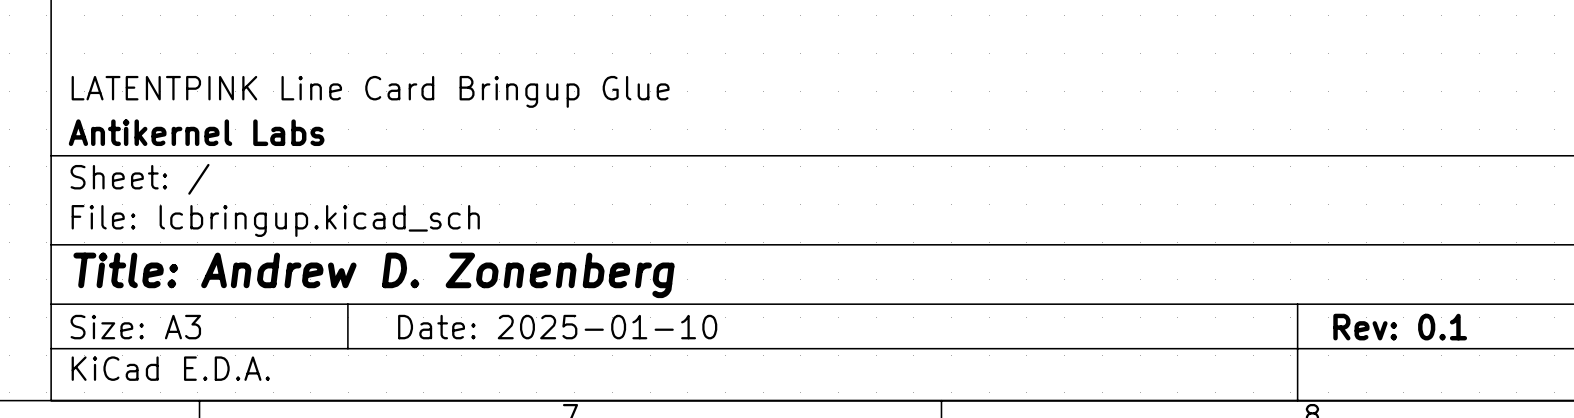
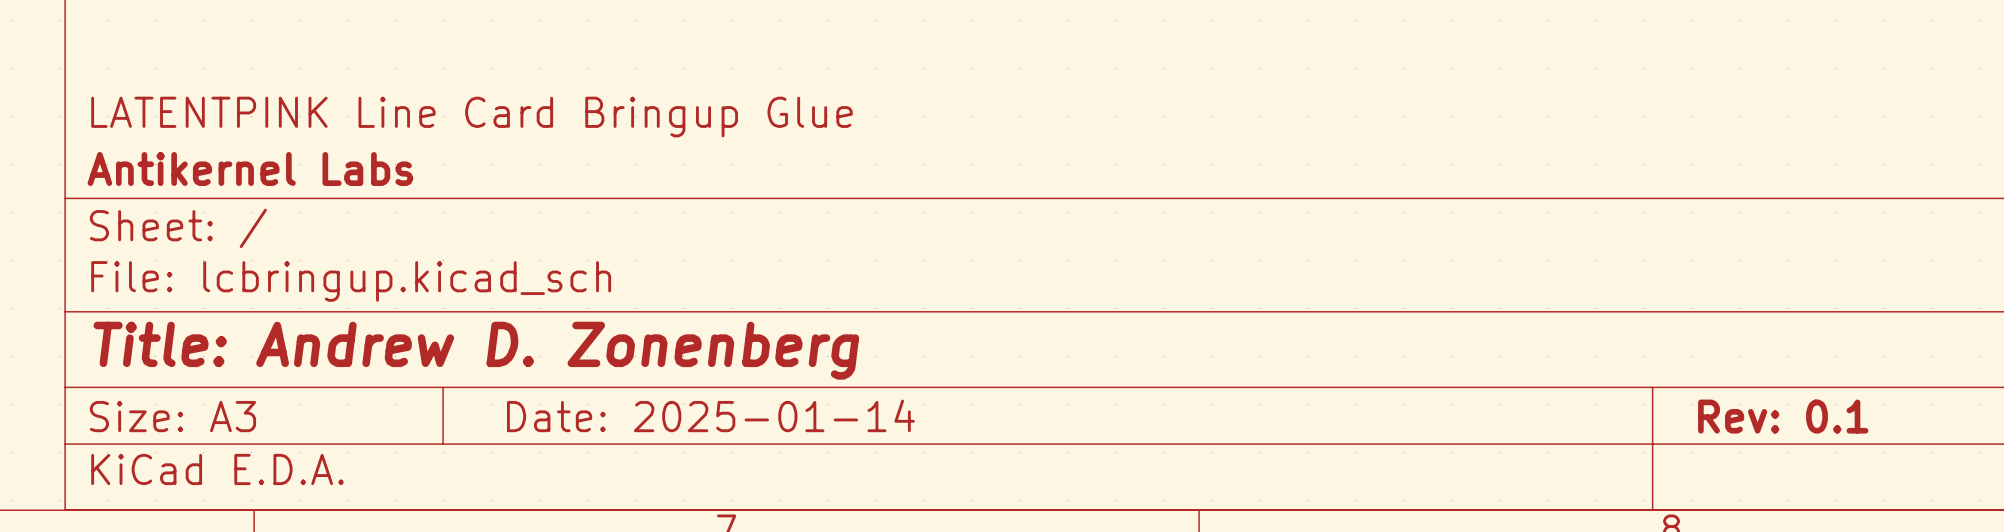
title block: Date: 2025-01-10 (557, 327) -> Date: 2025-01-14 (710, 415)

